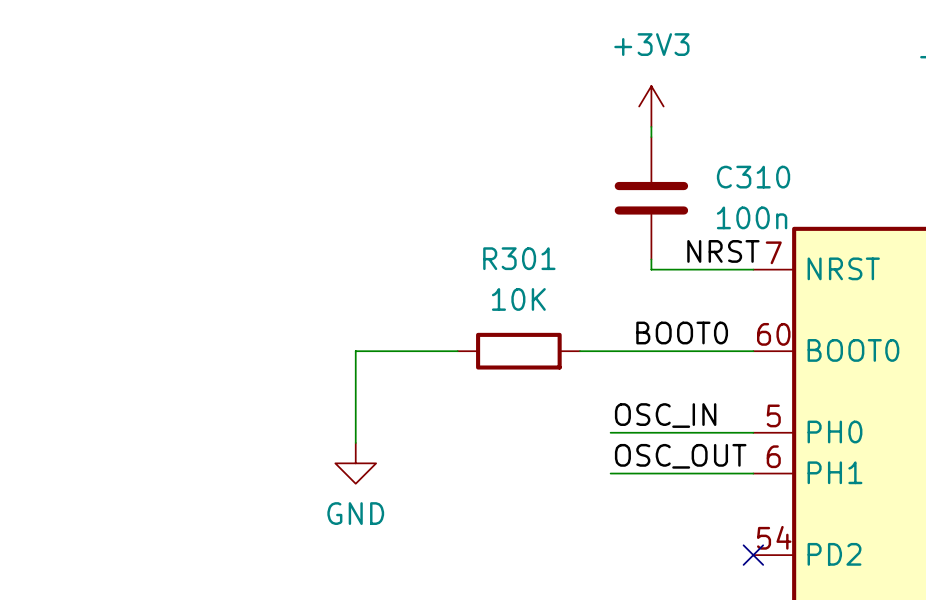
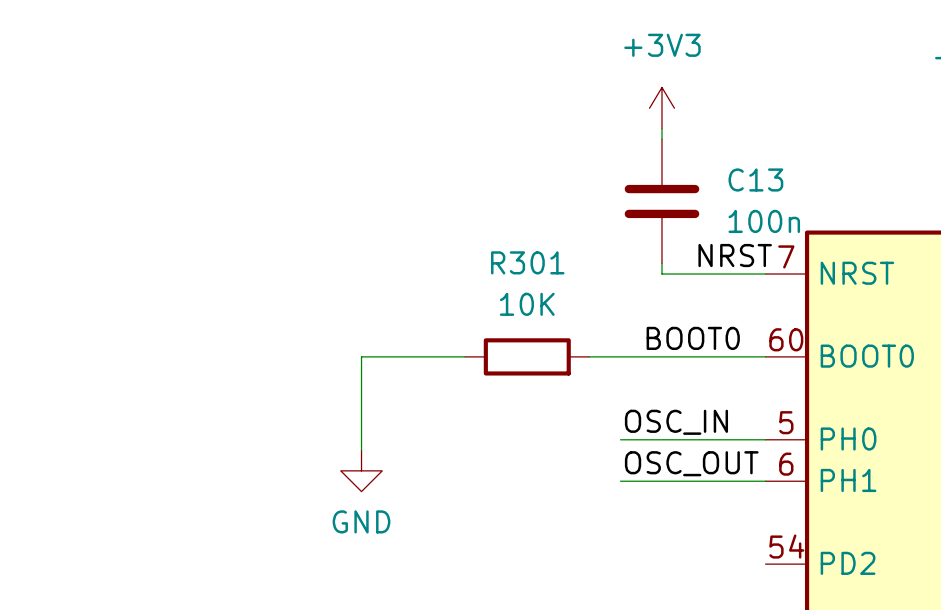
C310 name: C310 (753, 177) -> C13 (755, 179)
no-connect mark: (753, 555) -> none

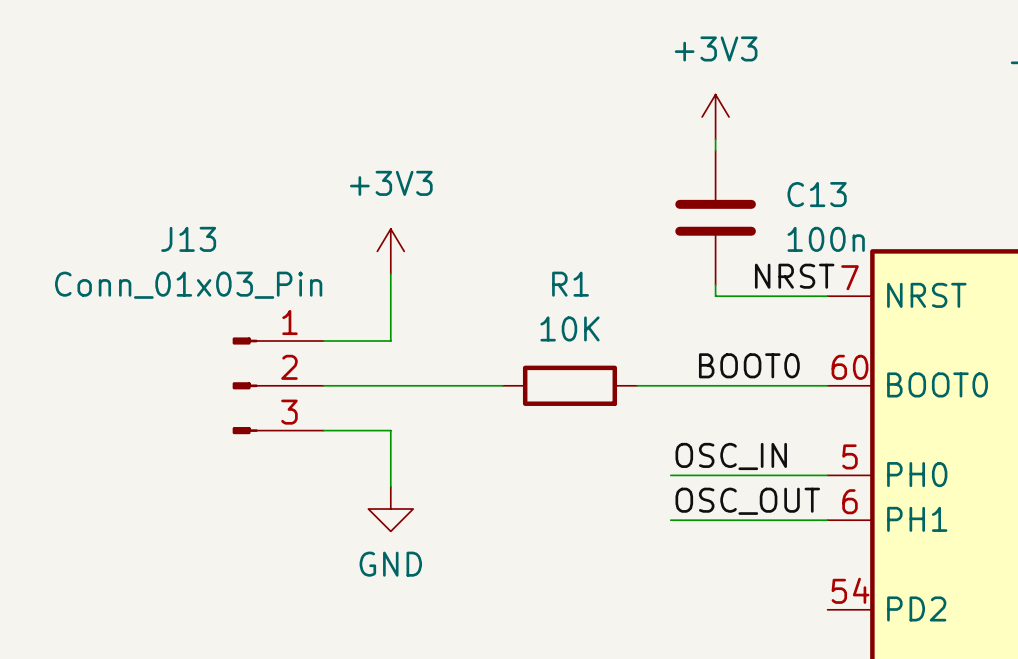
power symbol: none -> +3V3 (390, 251)
wire: none -> (390, 273) (390, 341) (323, 341)
R301 name: R301 (527, 262) -> R1 (570, 284)
J13: none -> Conn_01x03_Pin (278, 385)
wire: (361, 356) (361, 398) -> (390, 385) (323, 385)
wire: none -> (323, 430) (390, 430)

